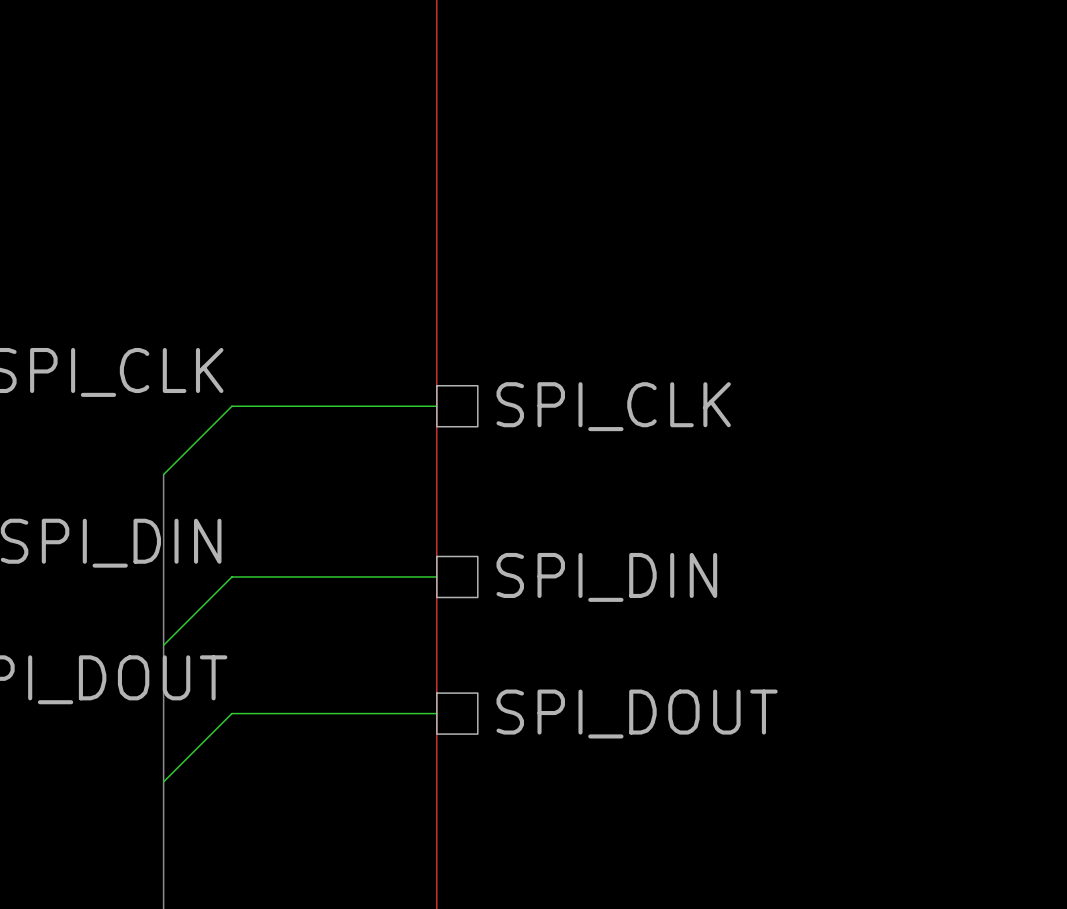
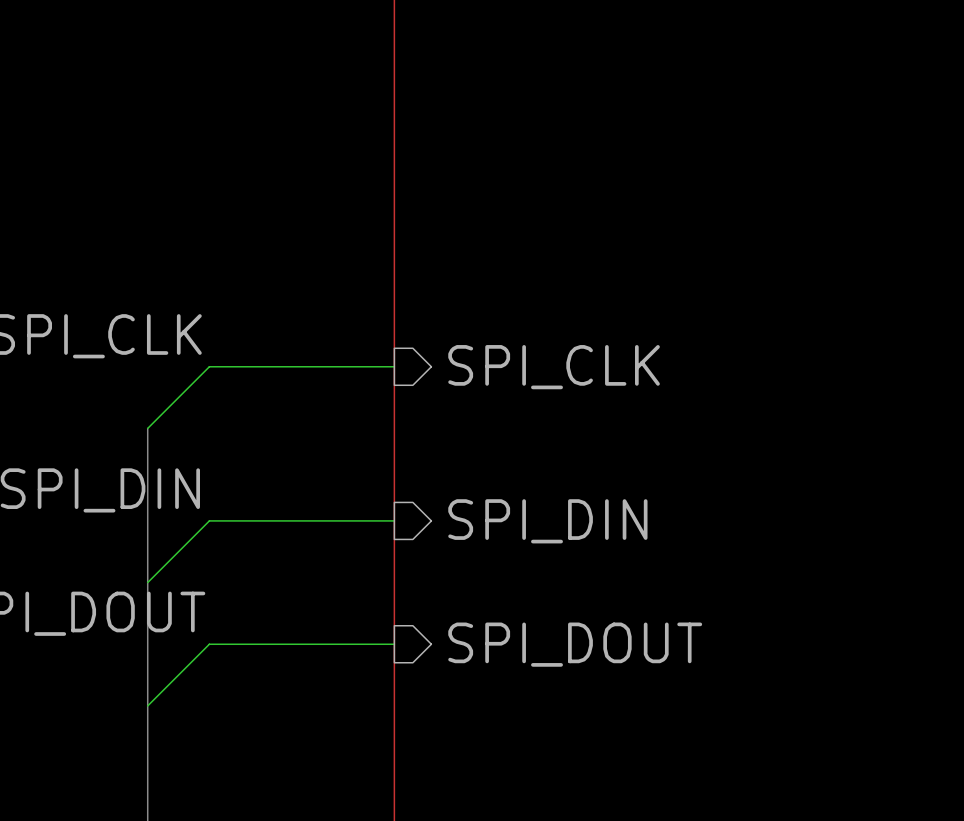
sheet pin shape: passive (613, 406) -> input (554, 367)
sheet pin shape: passive (606, 577) -> input (547, 521)
sheet pin shape: passive (637, 714) -> input (575, 644)

